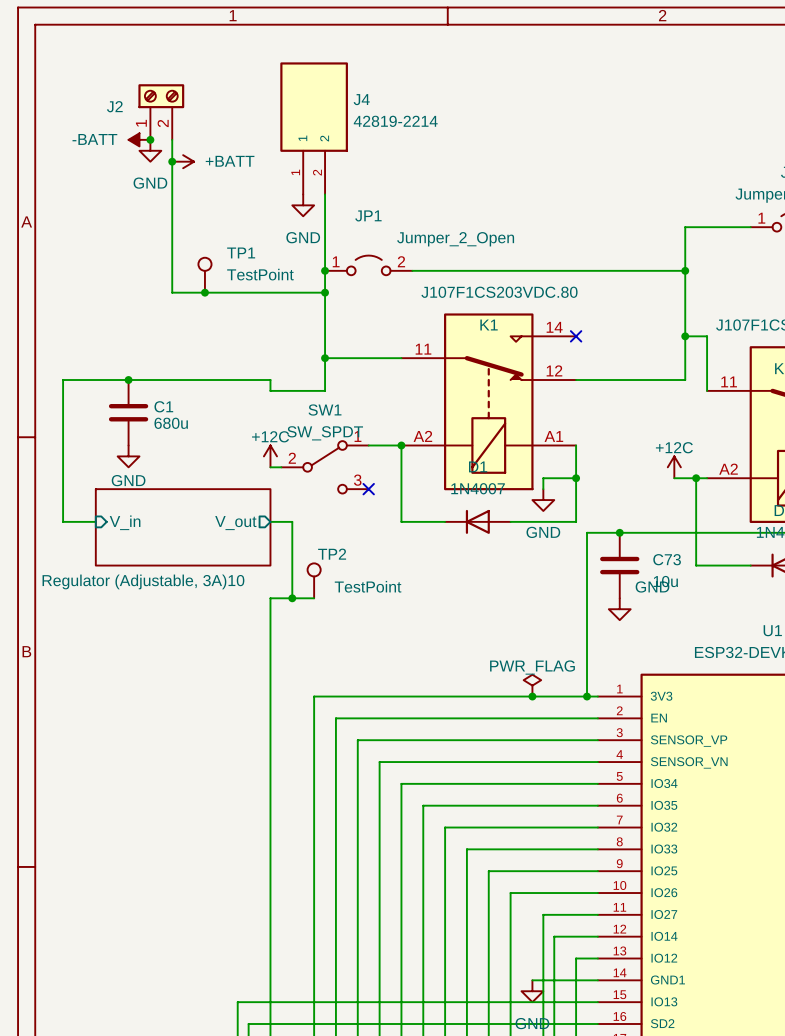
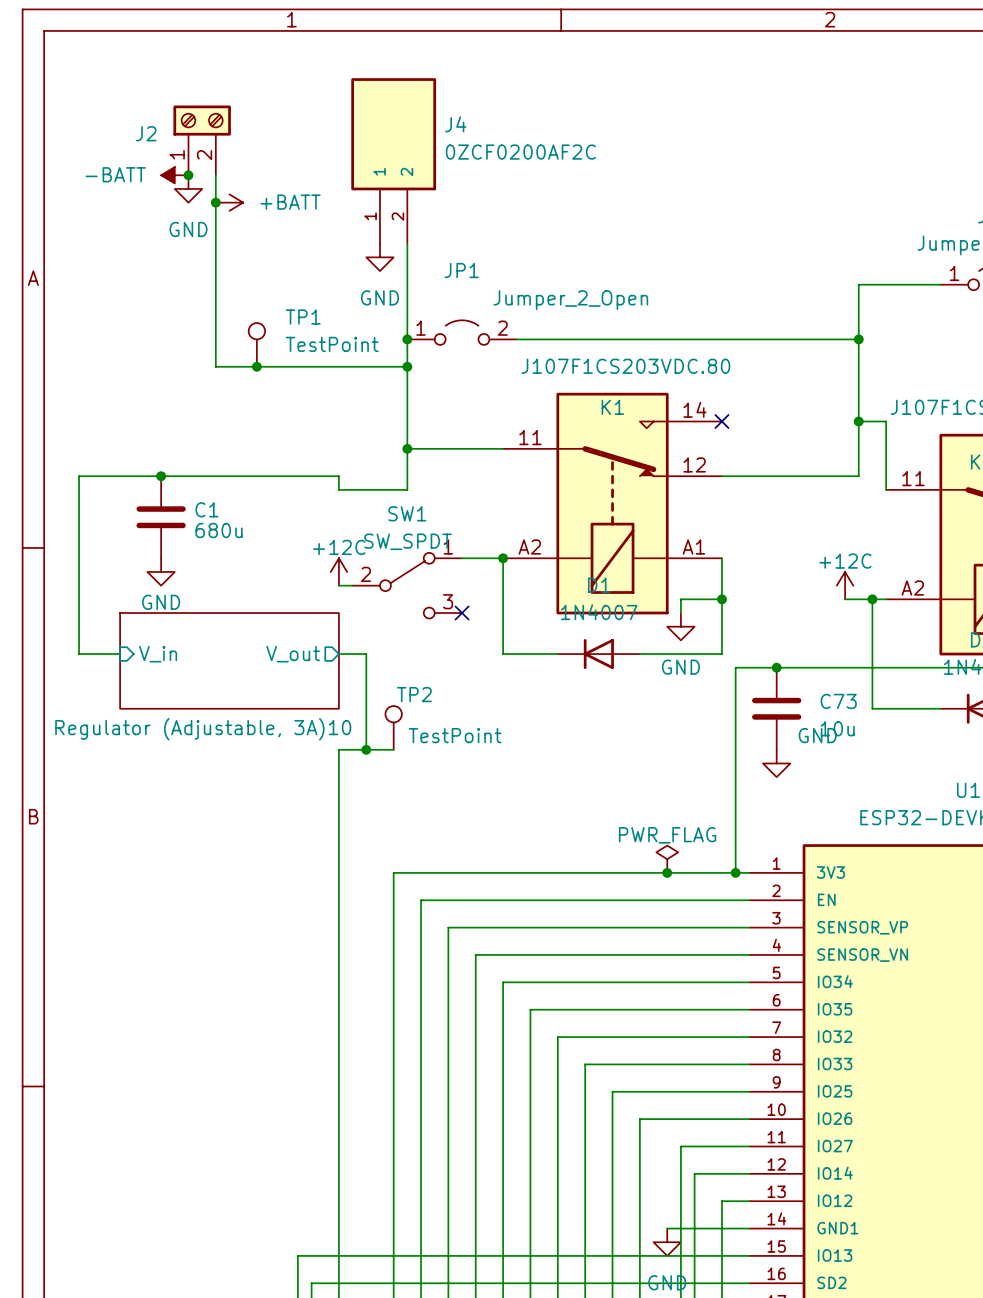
J4 value: 42819-2214 (395, 121) -> 0ZCF0200AF2C (520, 152)

